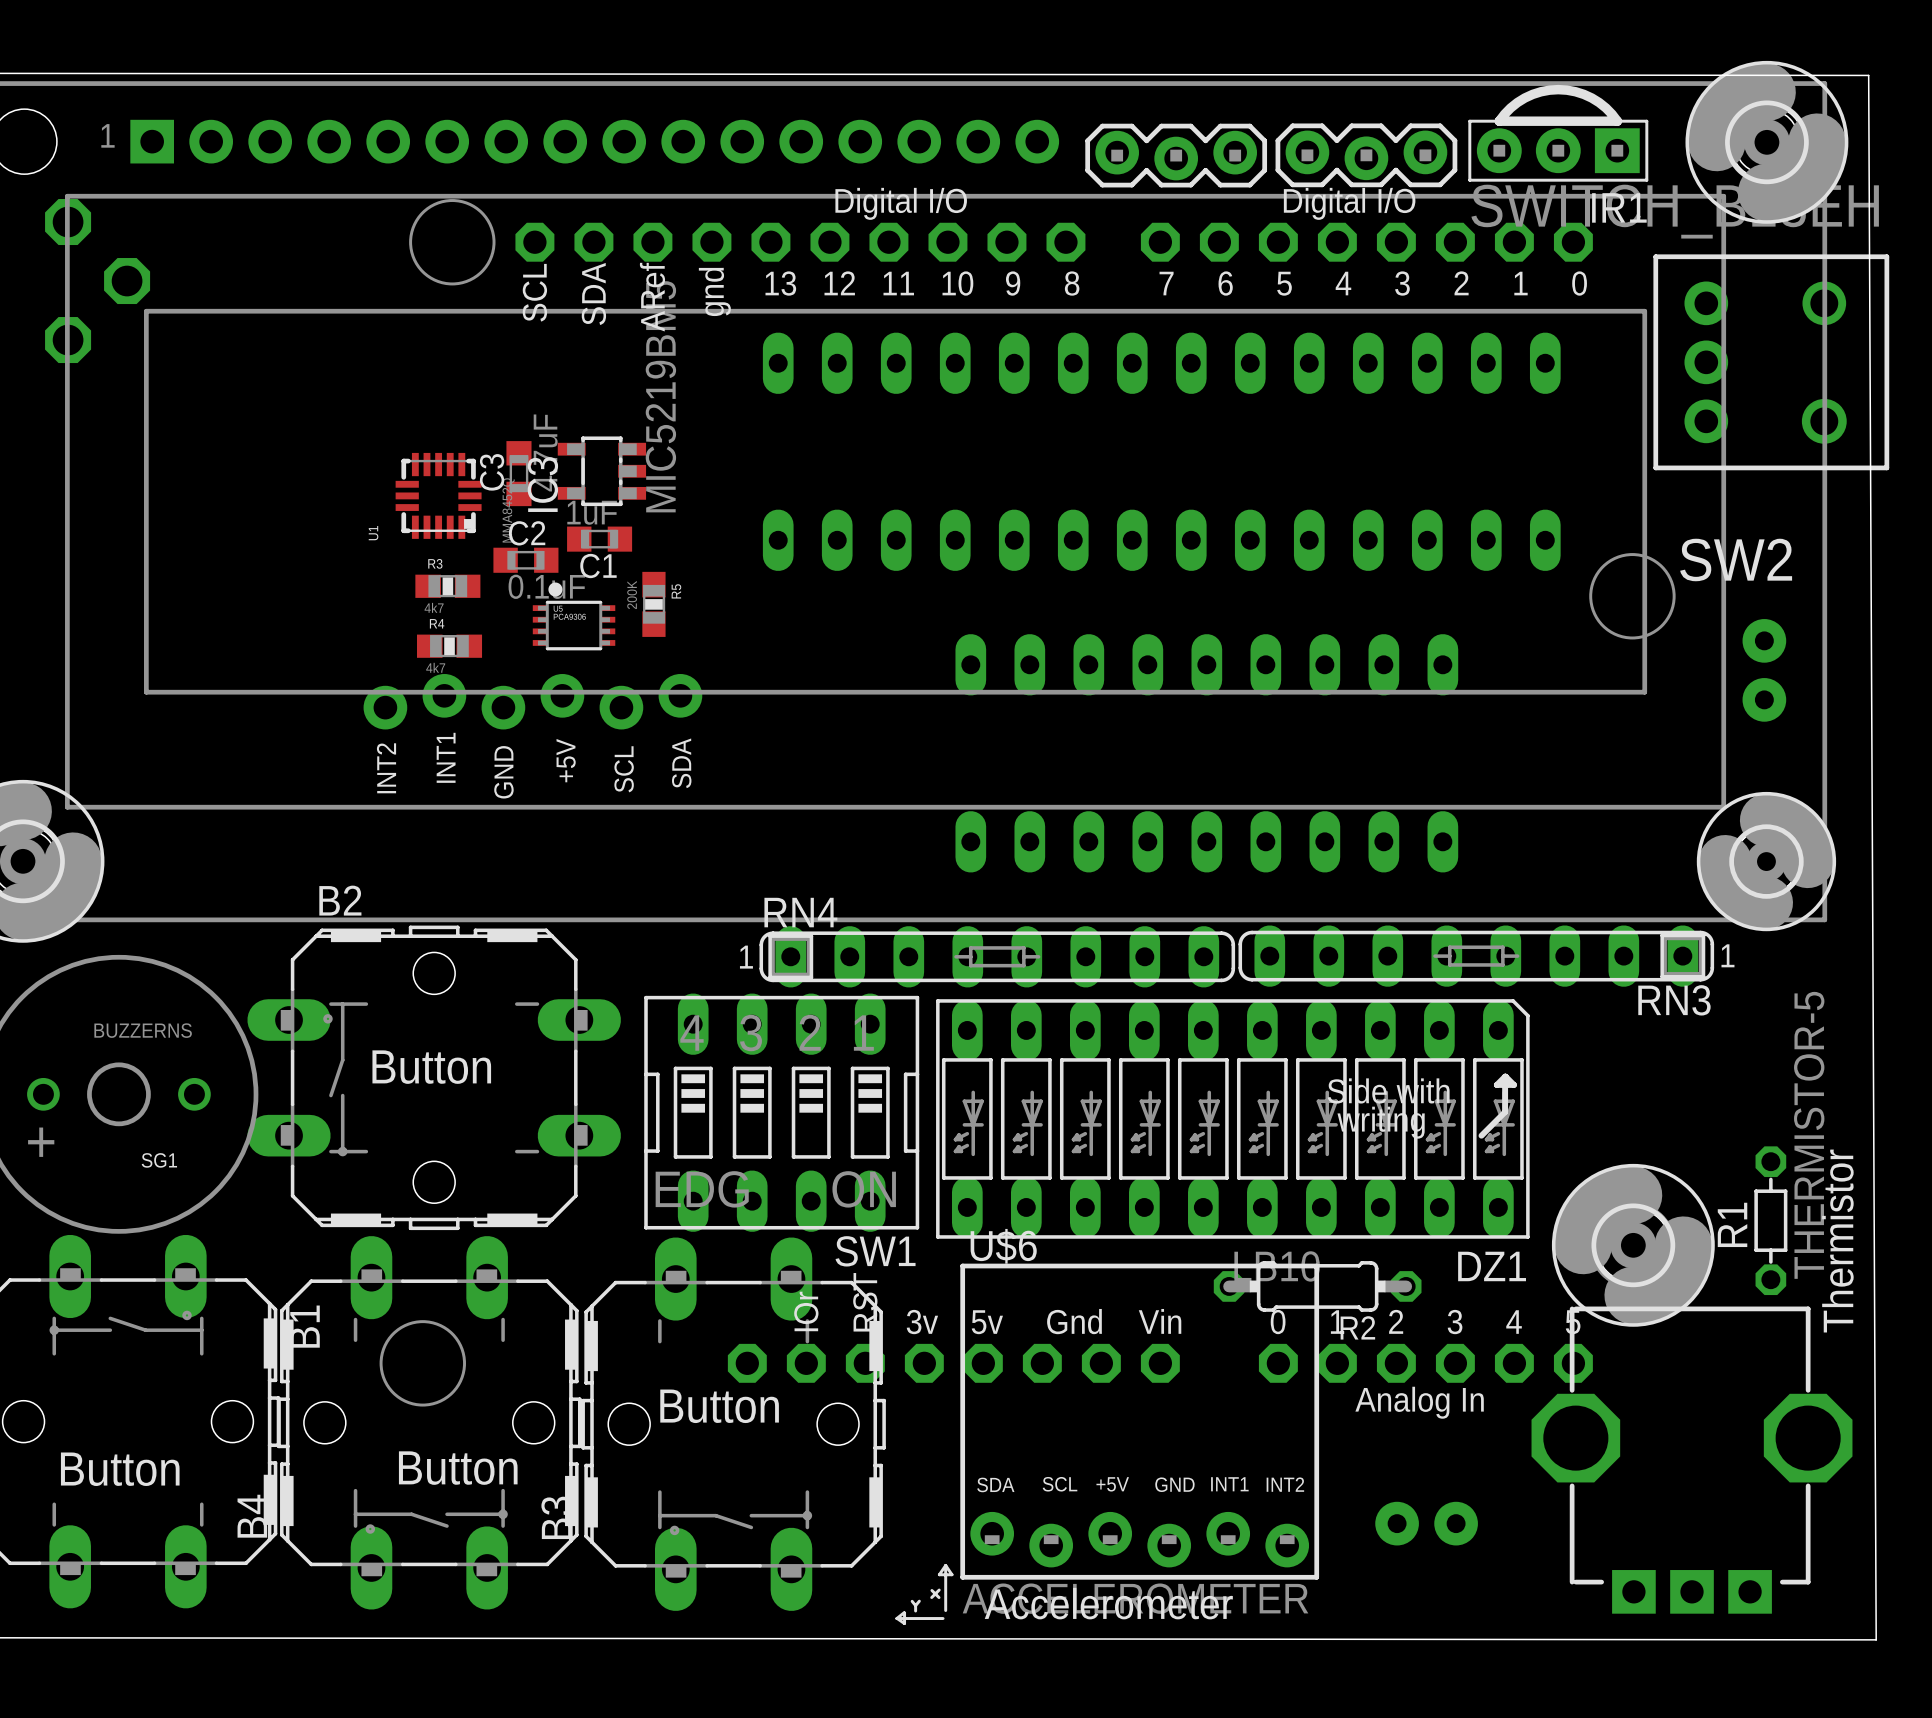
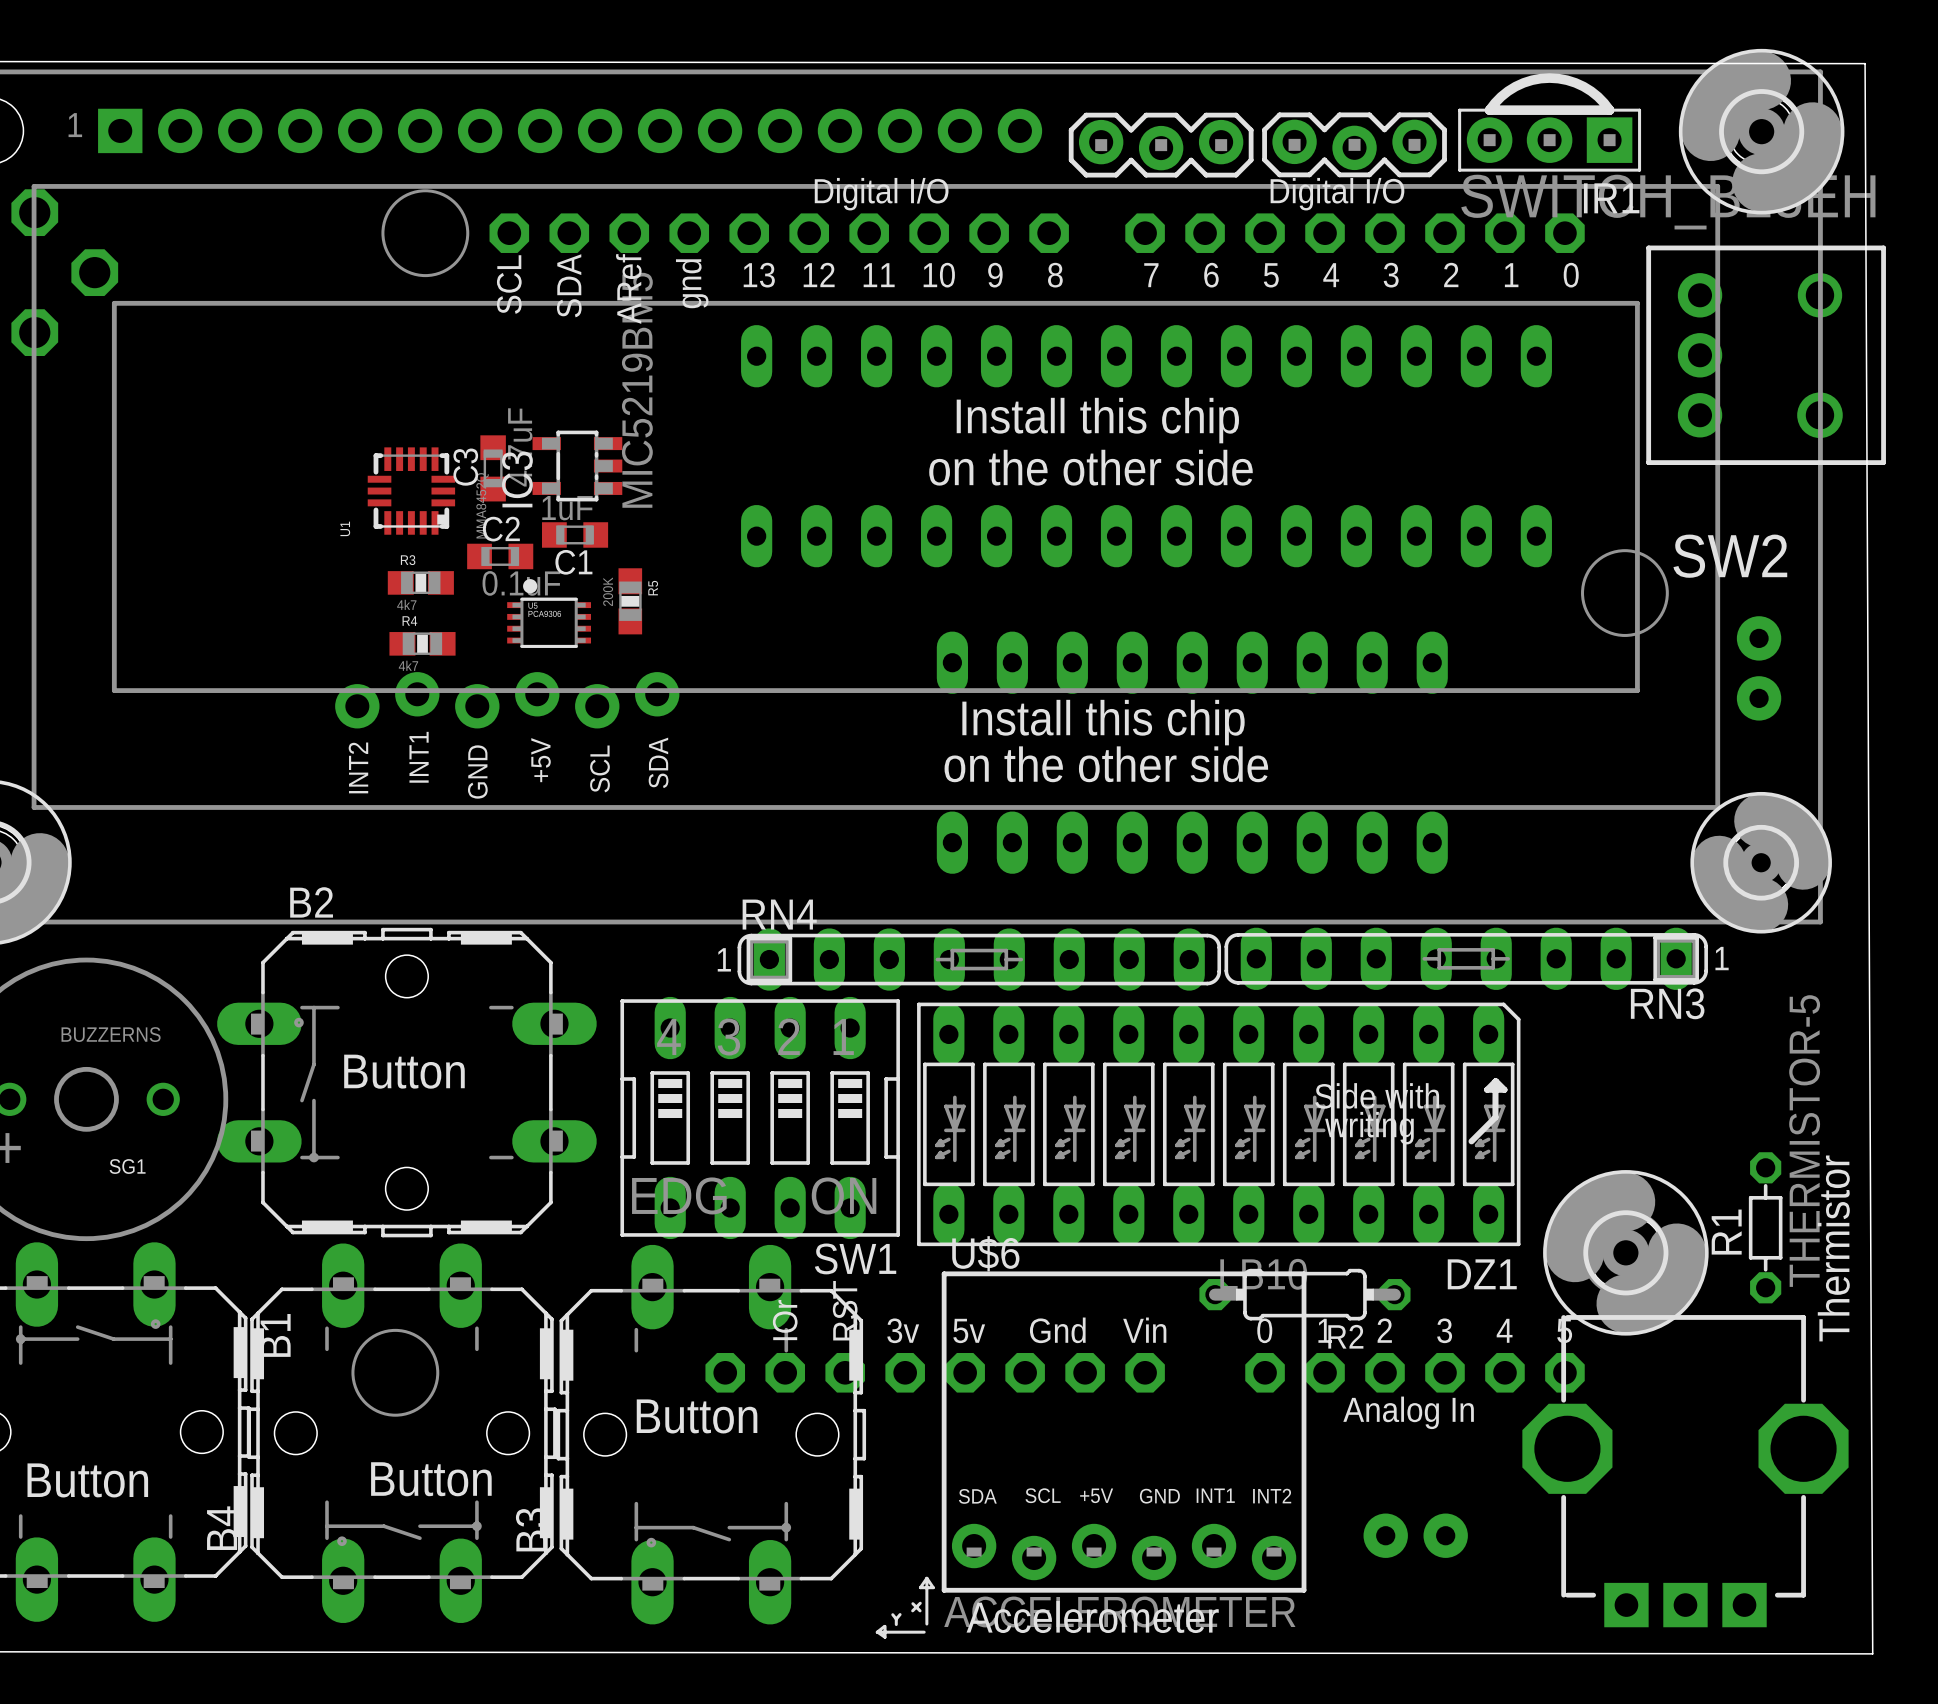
text: none -> Install this chip (1097, 420)
text: none -> on the other side (1090, 467)
text: none -> Install this chip (1103, 722)
text: none -> on the other side (1106, 764)

